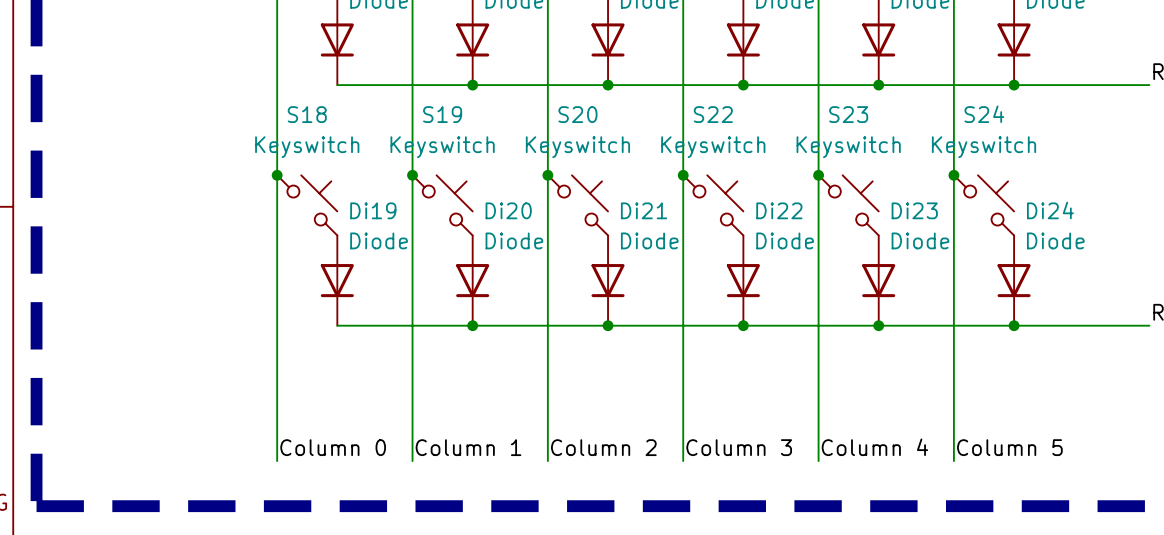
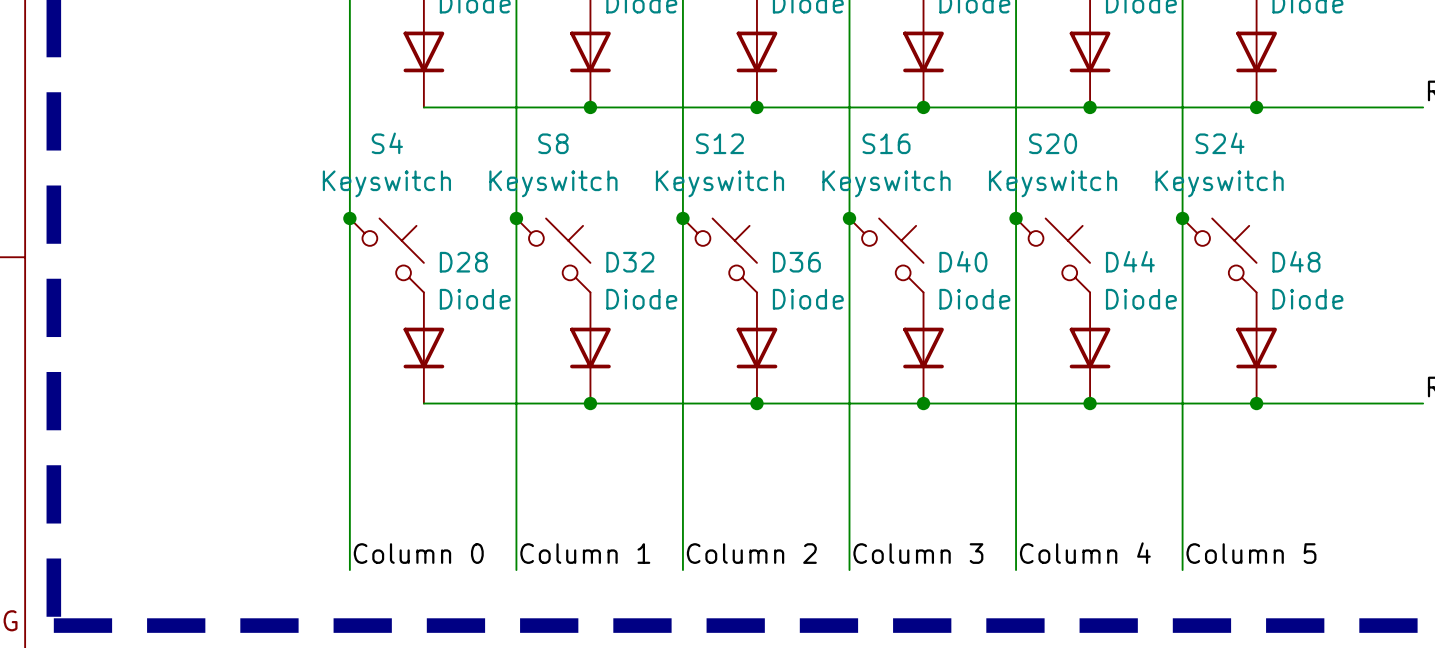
S18 name: S18 (307, 114) -> S4 (387, 143)
S19 name: S19 (442, 114) -> S8 (553, 143)
S20 name: S20 (577, 114) -> S12 (719, 143)
S22 name: S22 (713, 114) -> S16 (886, 143)
S23 name: S23 (848, 114) -> S20 (1053, 143)
Di19 name: Di19 (373, 210) -> D28 (463, 262)
Di20 name: Di20 (508, 210) -> D32 (630, 262)
Di21 name: Di21 (644, 210) -> D36 (796, 262)
Di22 name: Di22 (779, 210) -> D40 (963, 261)
Di23 name: Di23 (914, 210) -> D44 (1130, 261)
Di24 name: Di24 (1050, 210) -> D48 (1296, 261)

